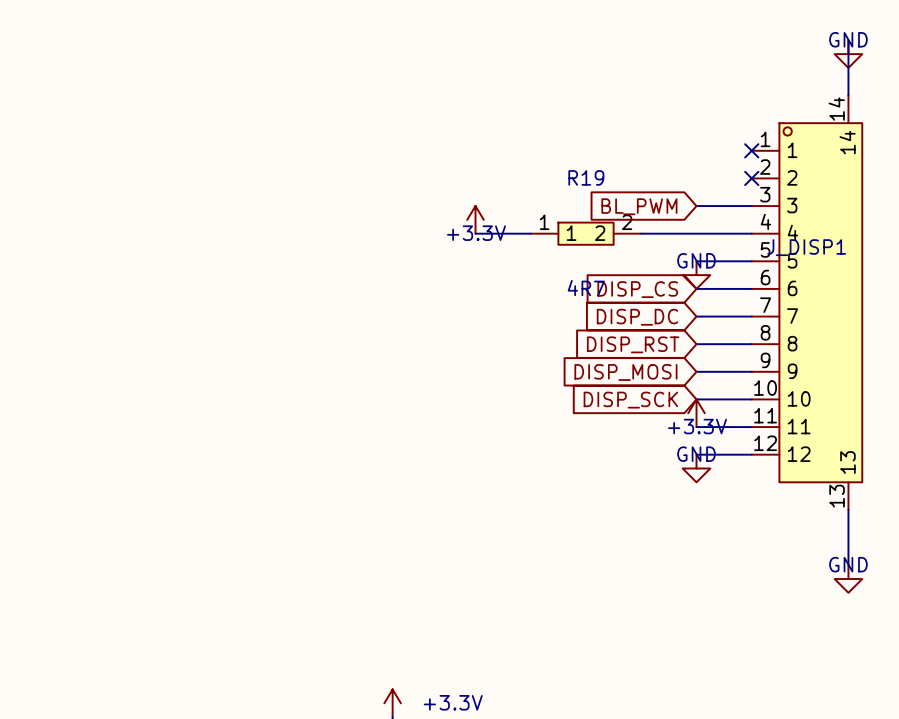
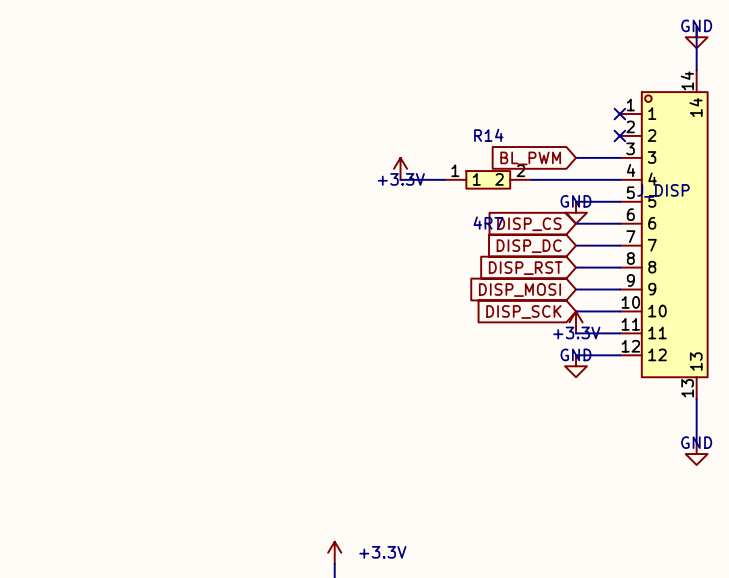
R19 name: R19 (586, 177) -> R14 (488, 135)
J_DISP1 name: J_DISP1 (806, 247) -> J_DISP (663, 190)

